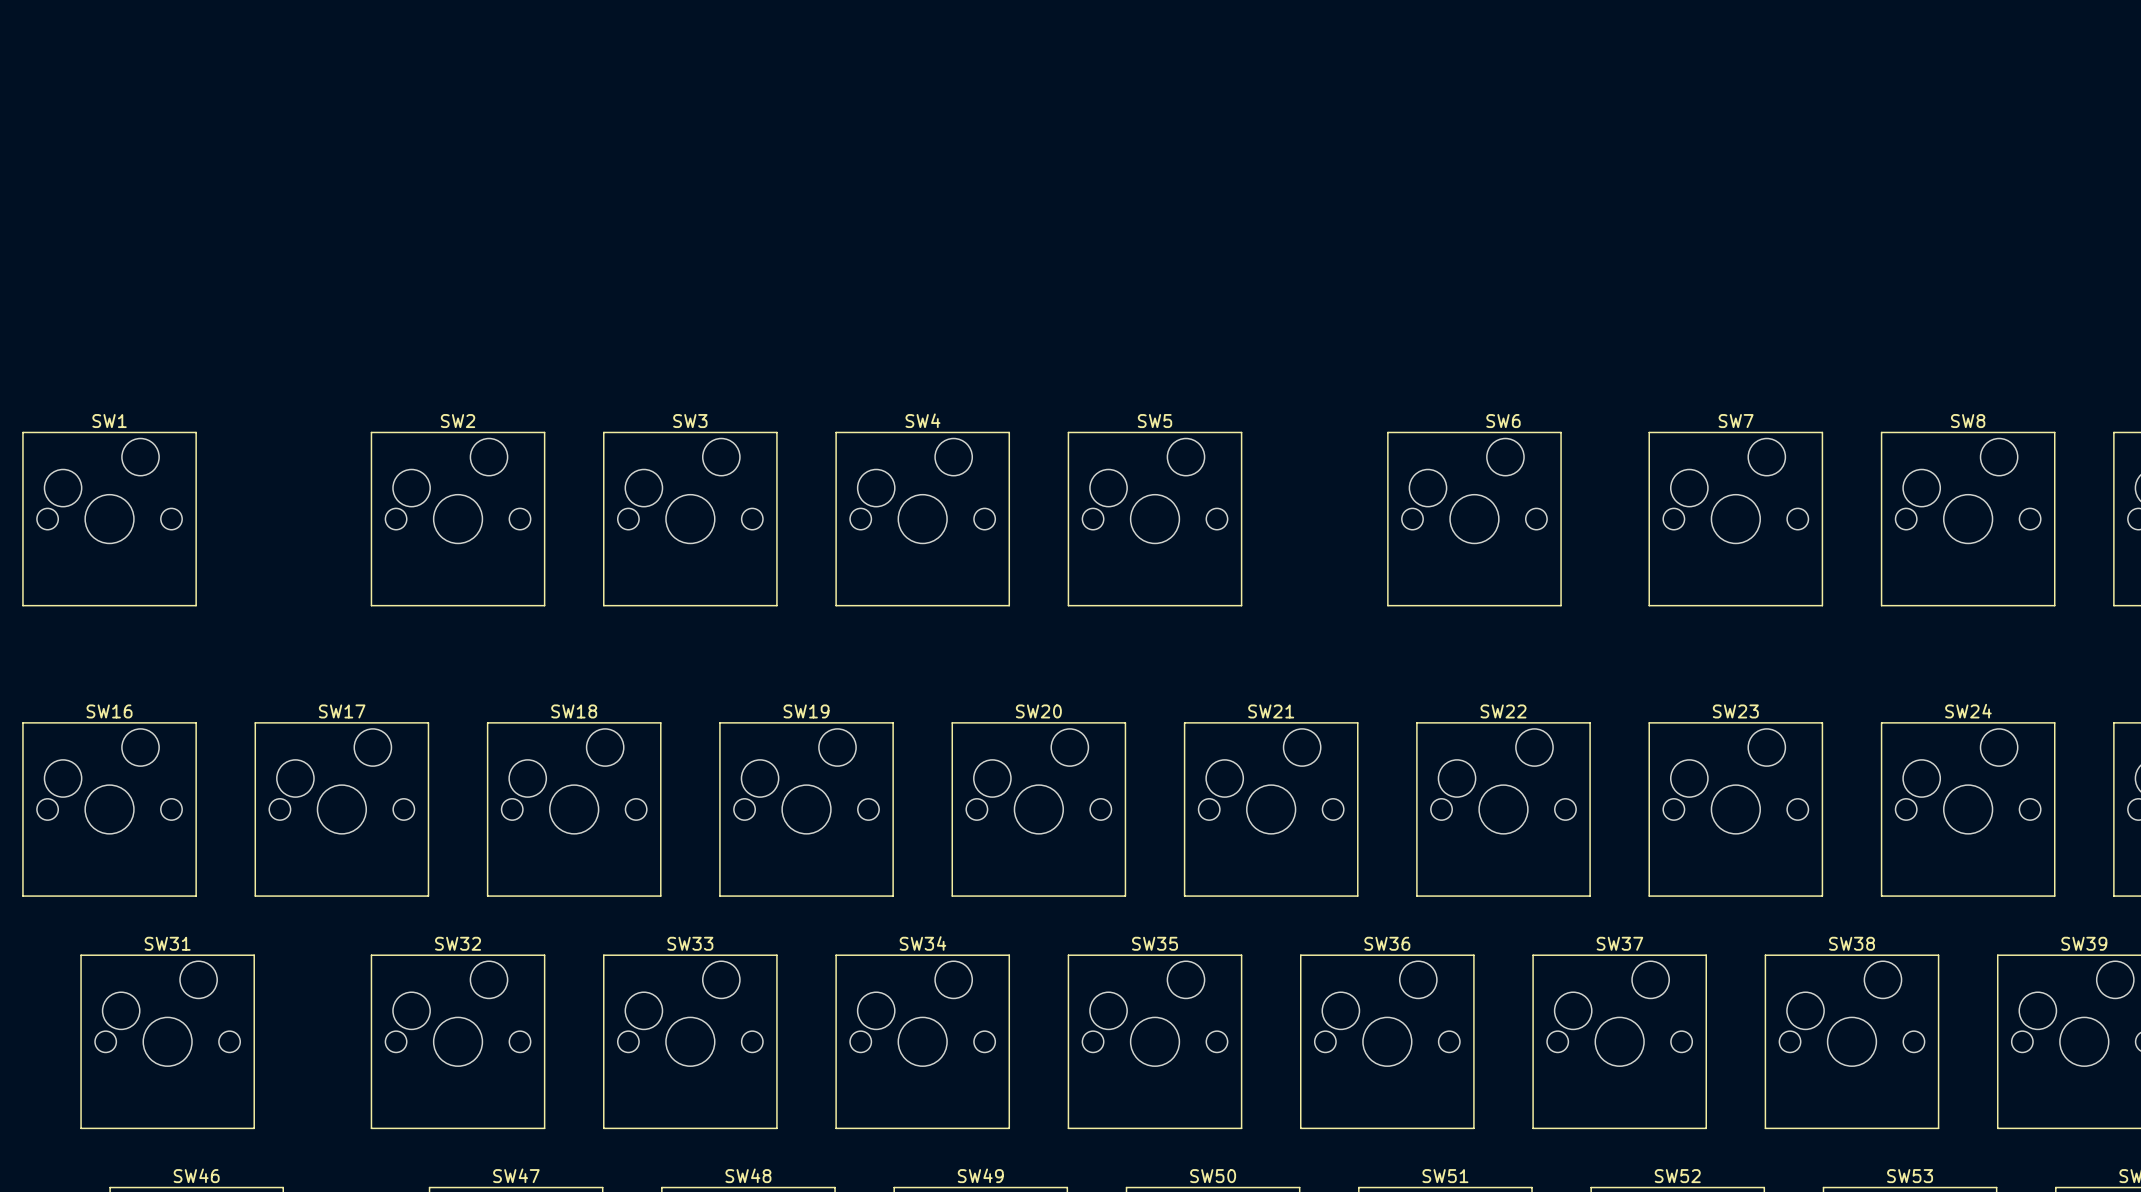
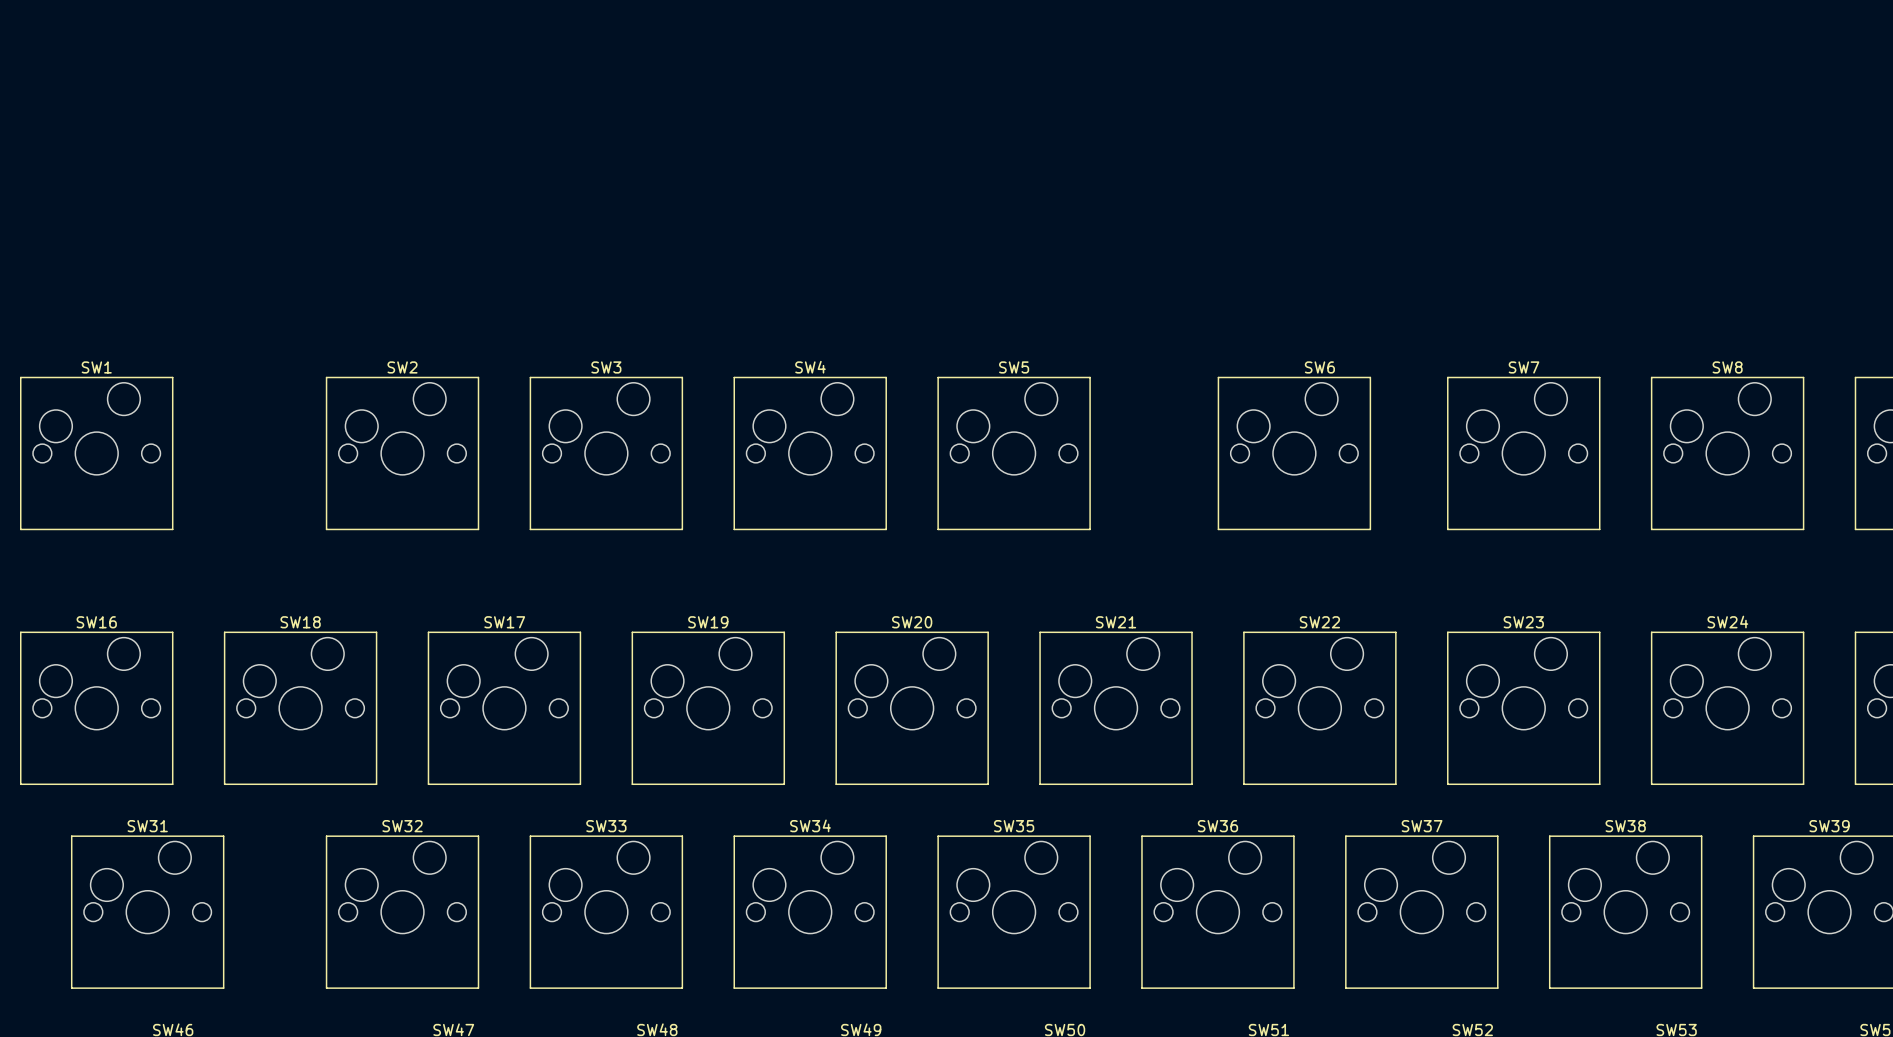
SW17 name: SW17 (342, 711) -> SW18 (300, 622)
SW18 name: SW18 (574, 711) -> SW17 (504, 622)

